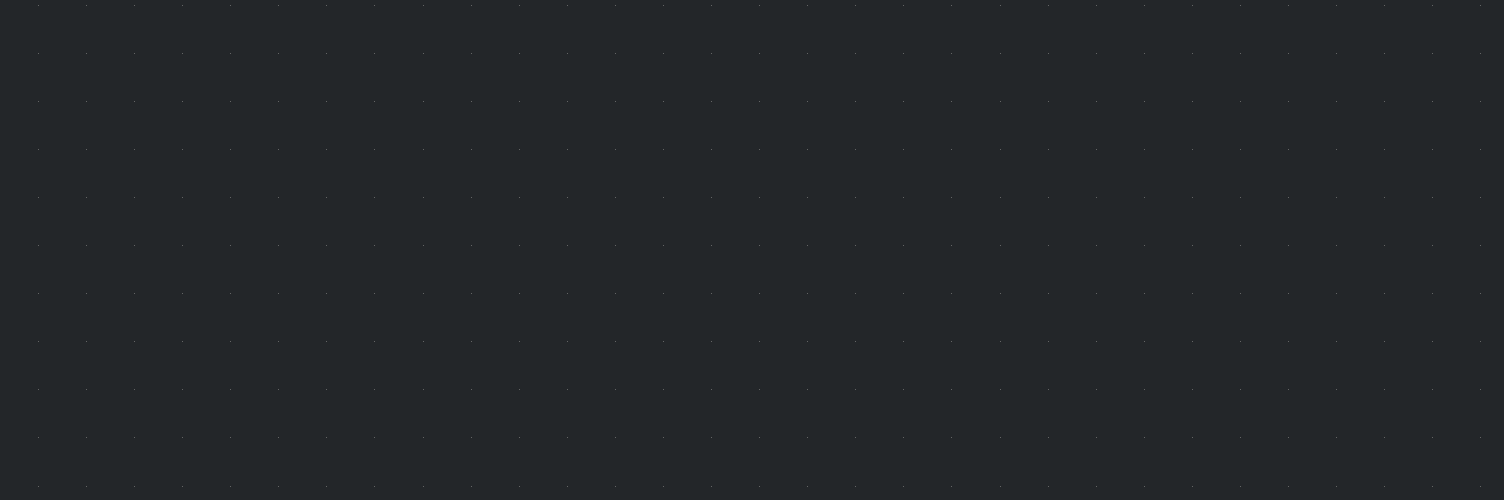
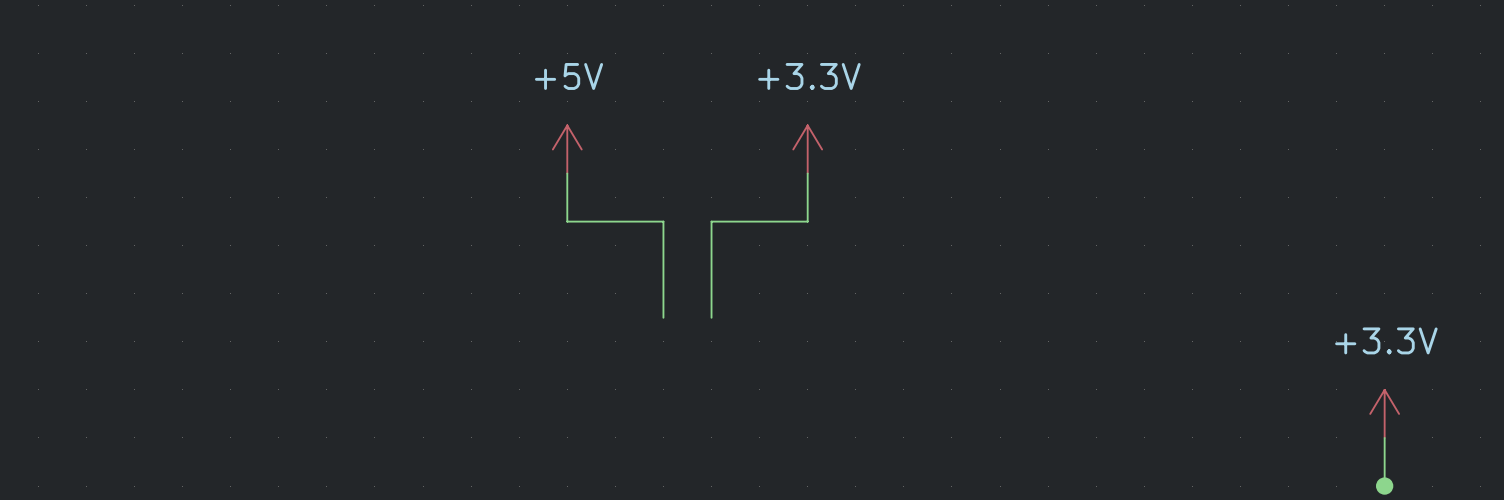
power symbol: none -> +5V (567, 149)
power symbol: none -> +3.3V (807, 149)
wire: none -> (567, 173) (567, 221) (663, 221) (663, 317)
wire: none -> (807, 173) (807, 221) (711, 221) (711, 317)
power symbol: none -> +3.3V (1384, 413)
wire: none -> (1384, 437) (1384, 486)
junction: none -> (1384, 486)

